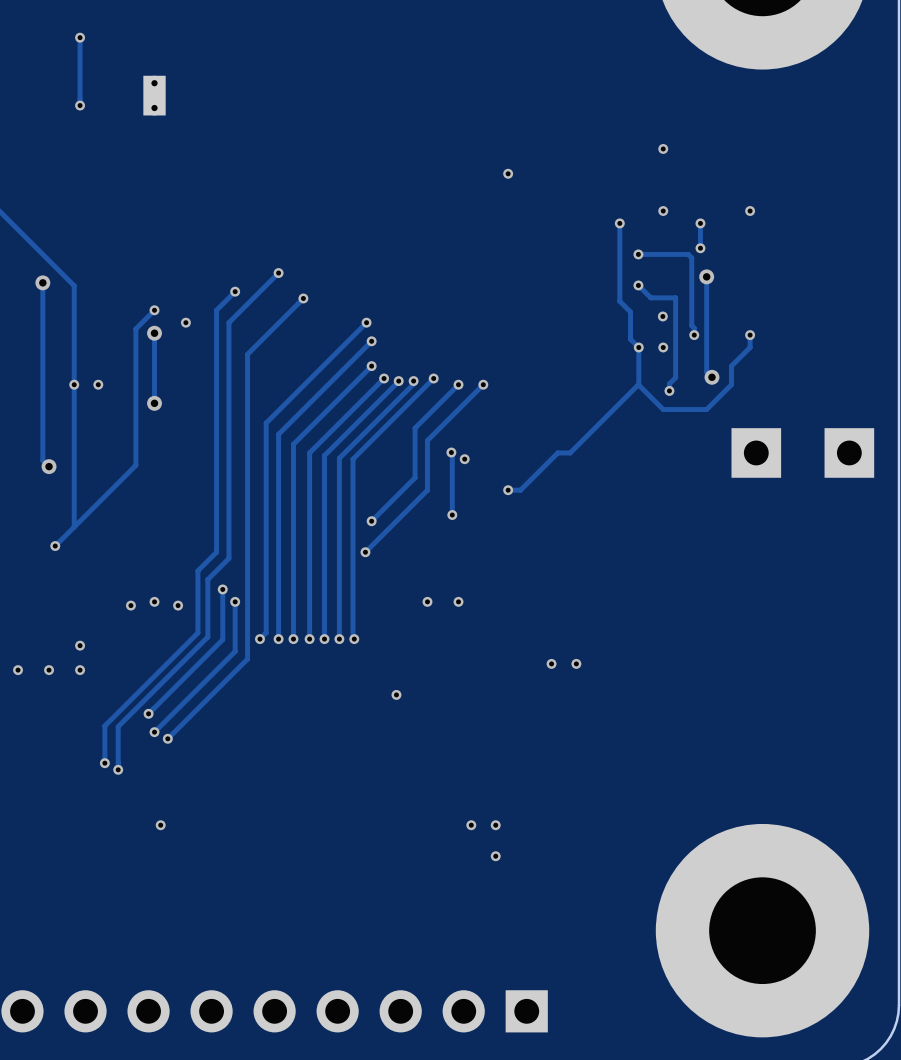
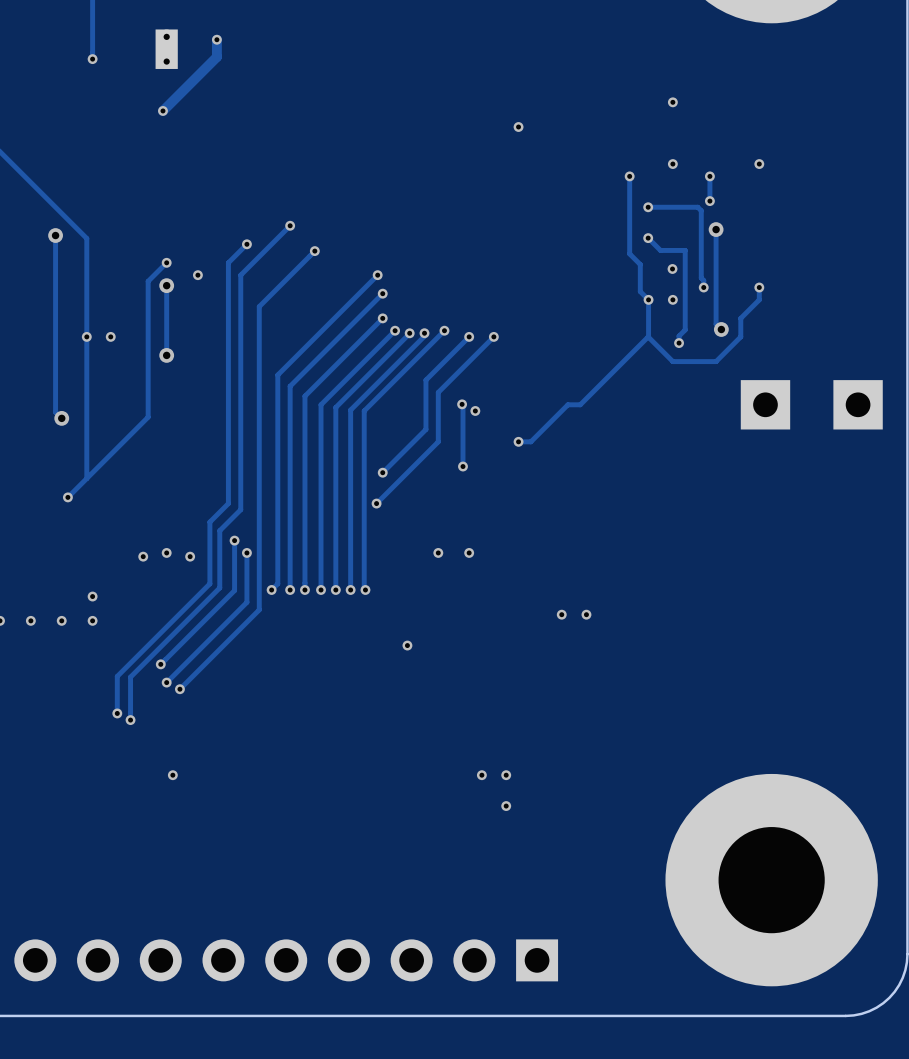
track: none -> (216, 39) (216, 57) (162, 110)
via: none -> (216, 39)
via: none -> (162, 110)

